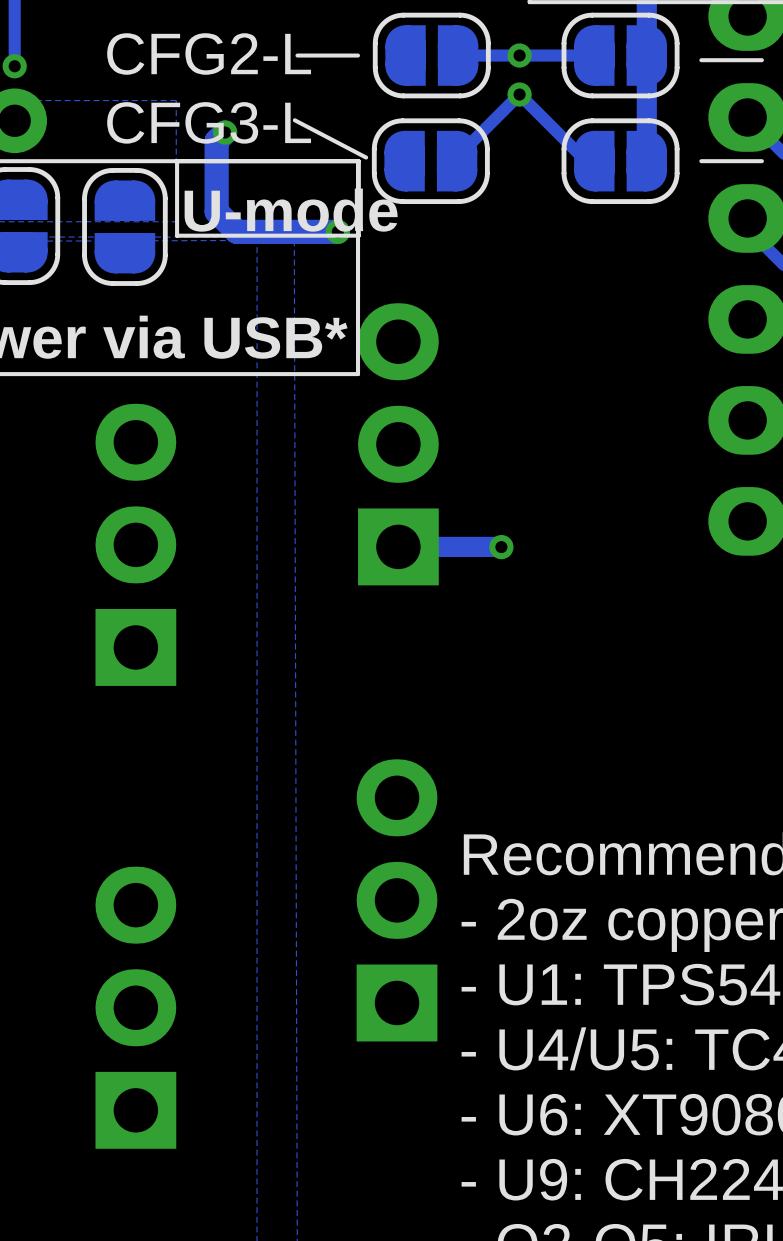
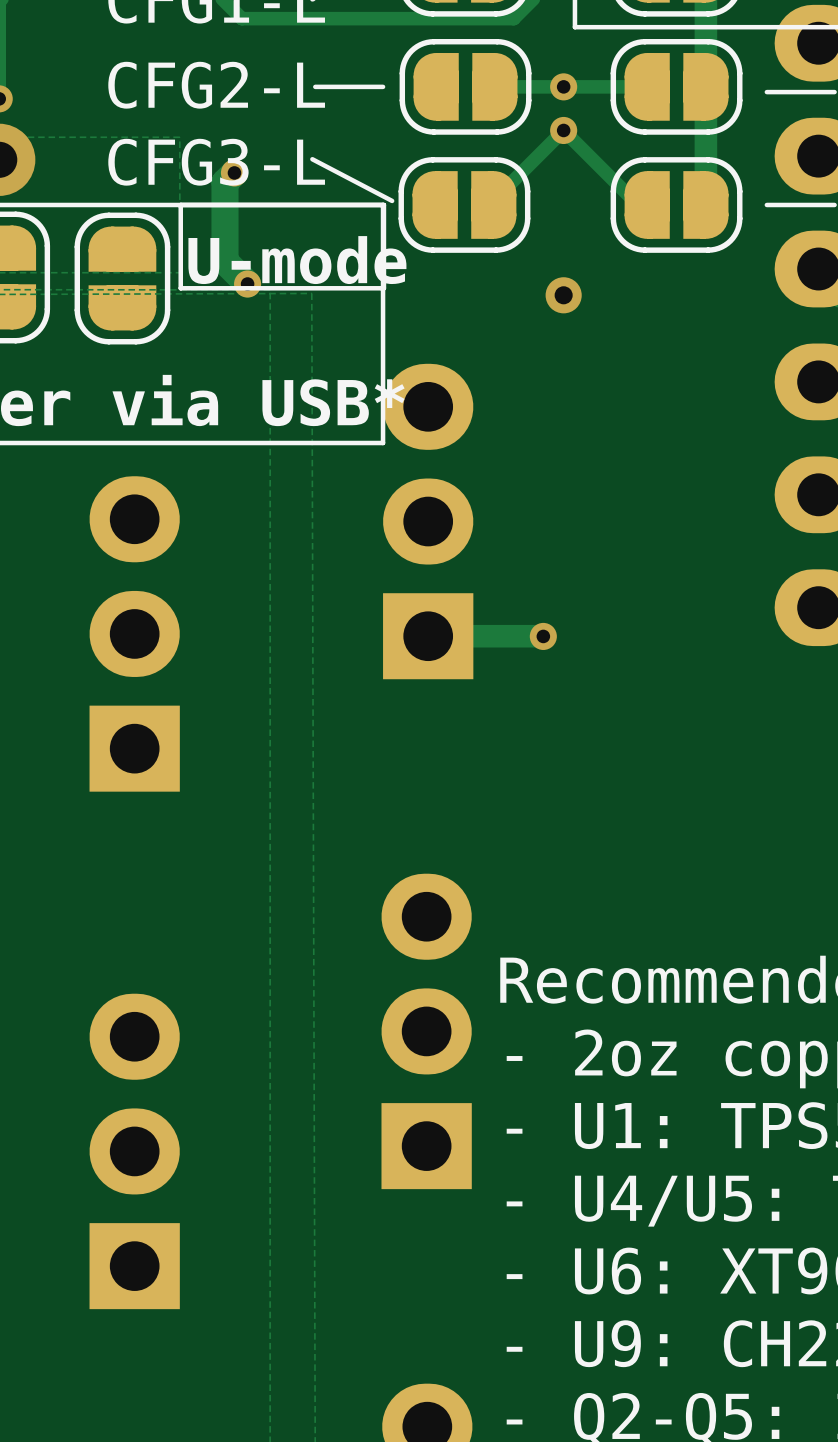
track: (337, 231) (236, 231) -> none
via position: (337, 231) -> (247, 284)
via: none -> (563, 295)

